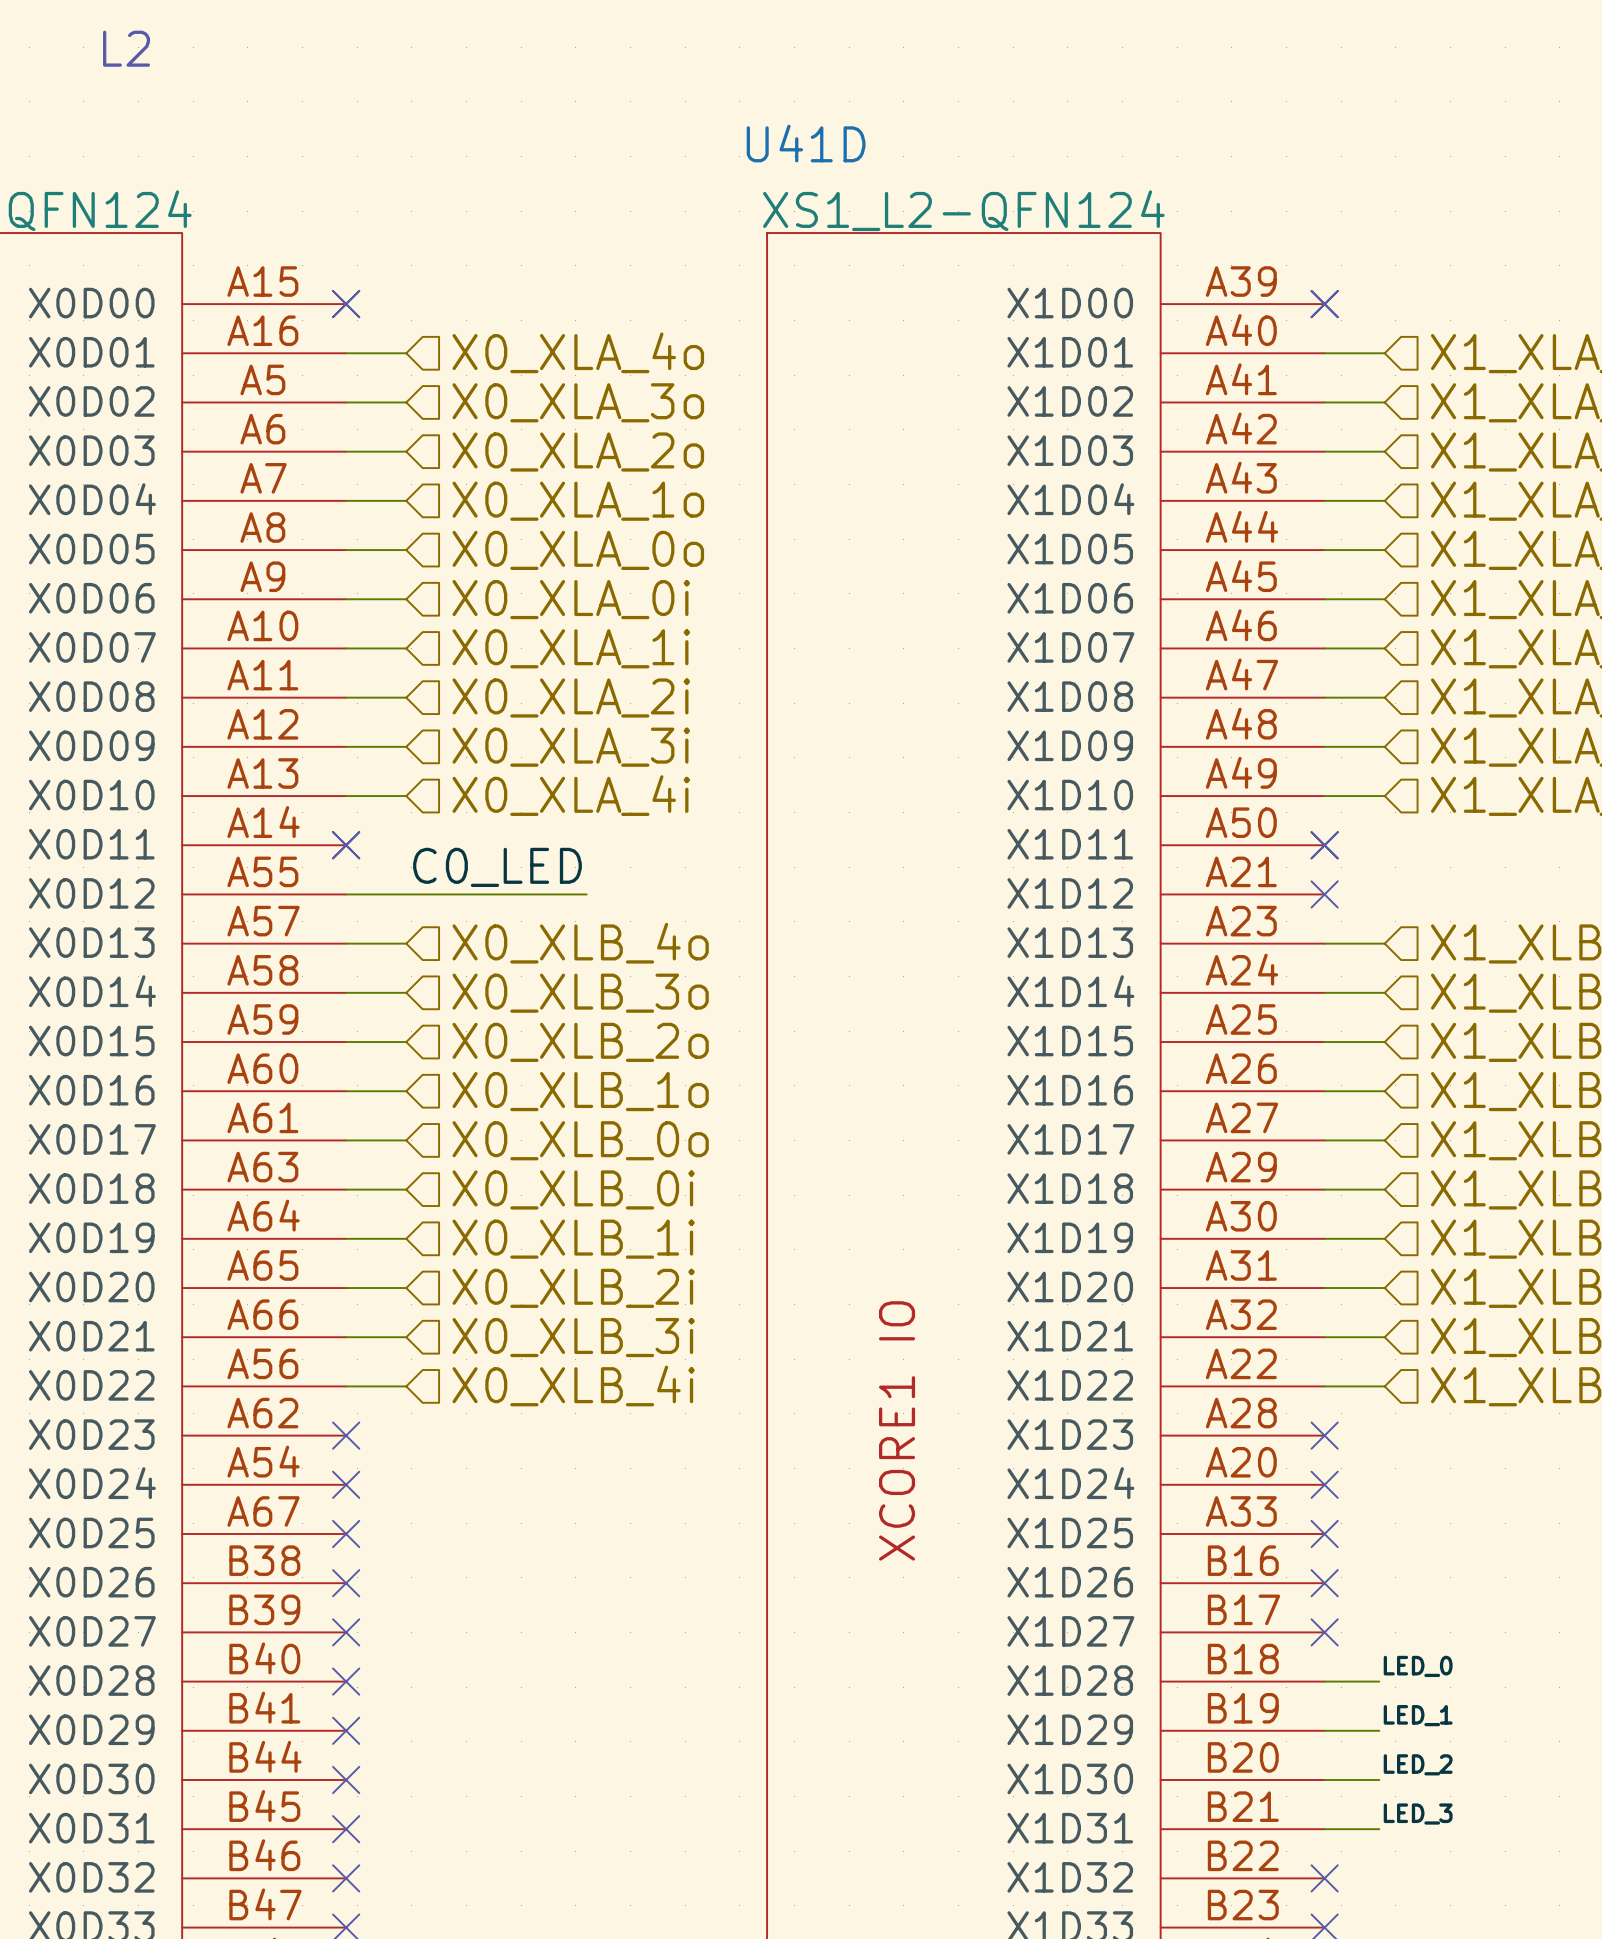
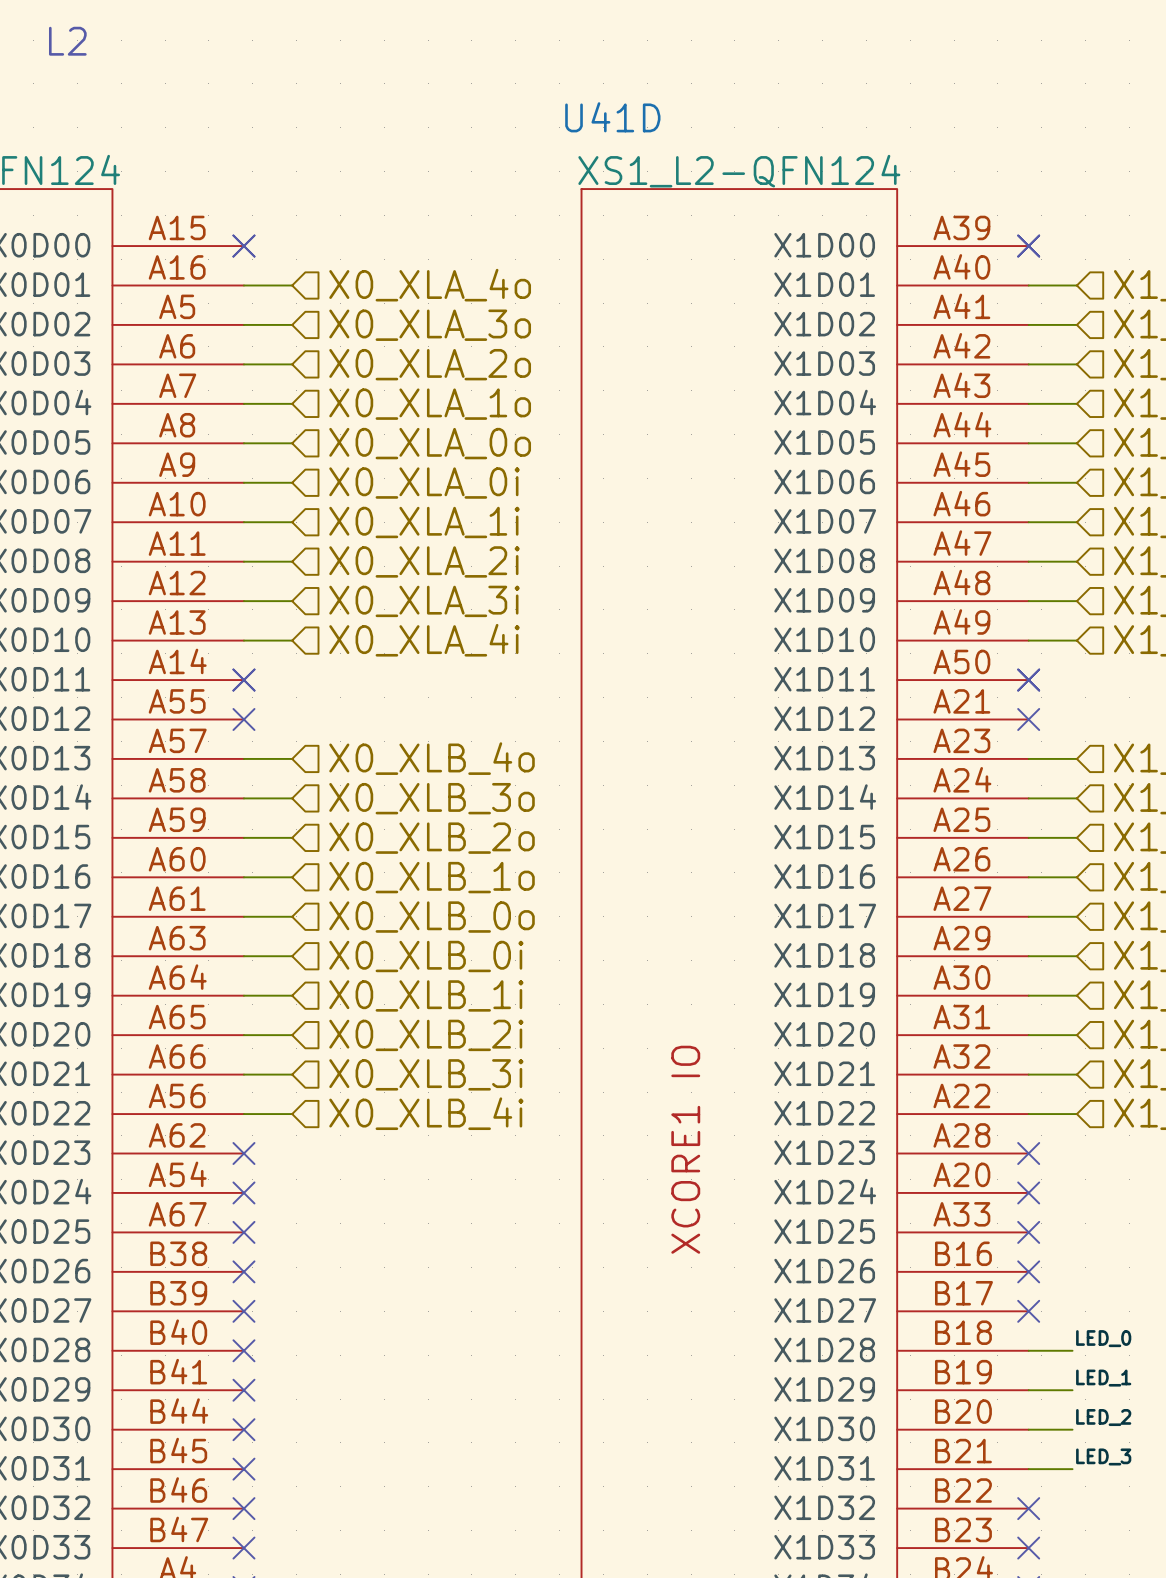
label: C0_LED (497, 867) -> none
wire: (346, 894) (586, 894) -> none
no-connect mark: none -> (243, 719)

